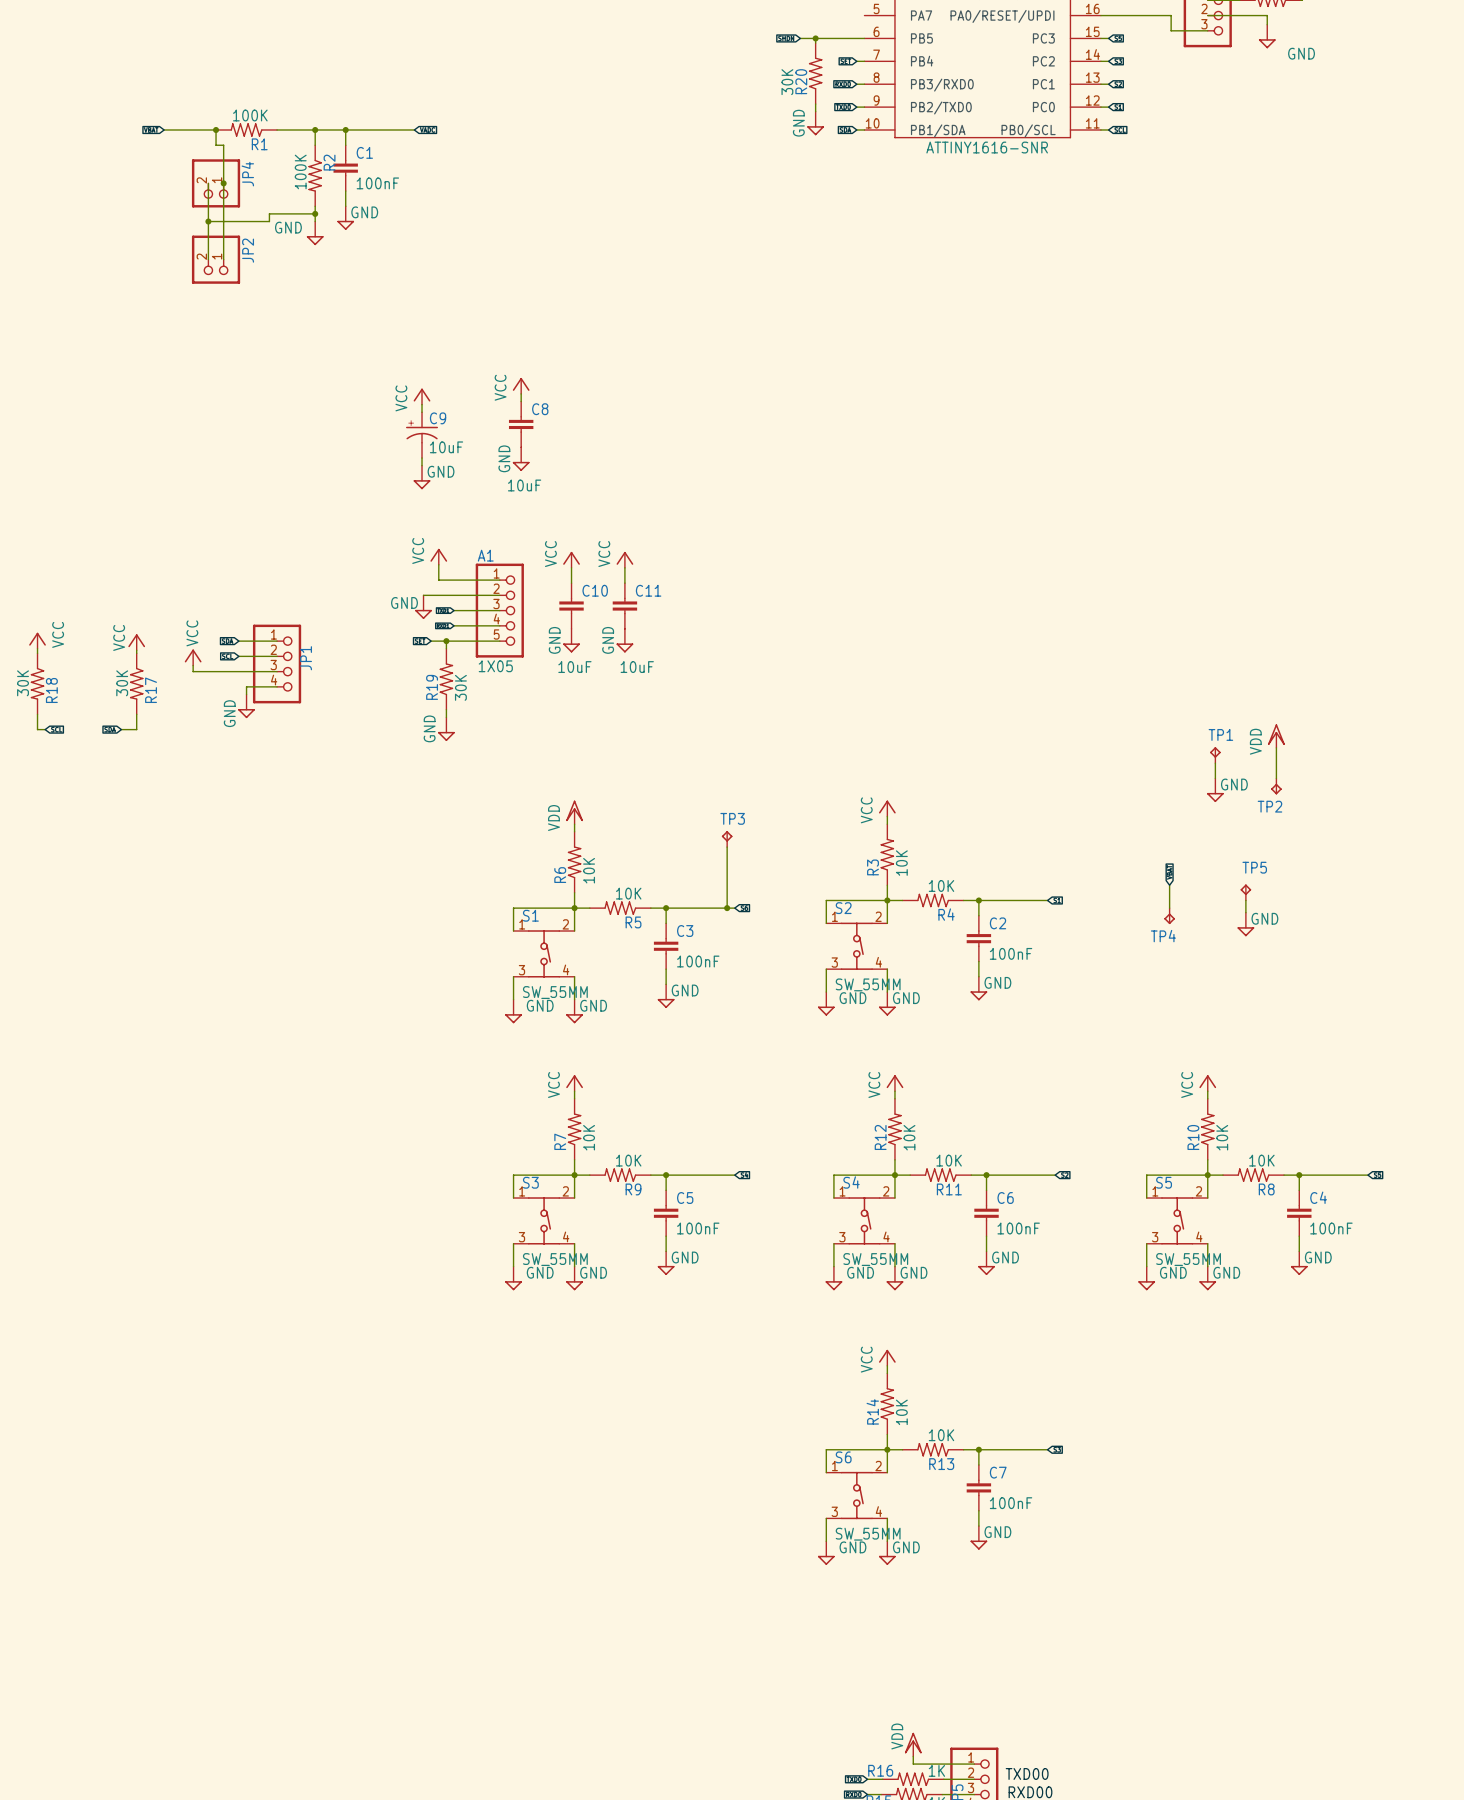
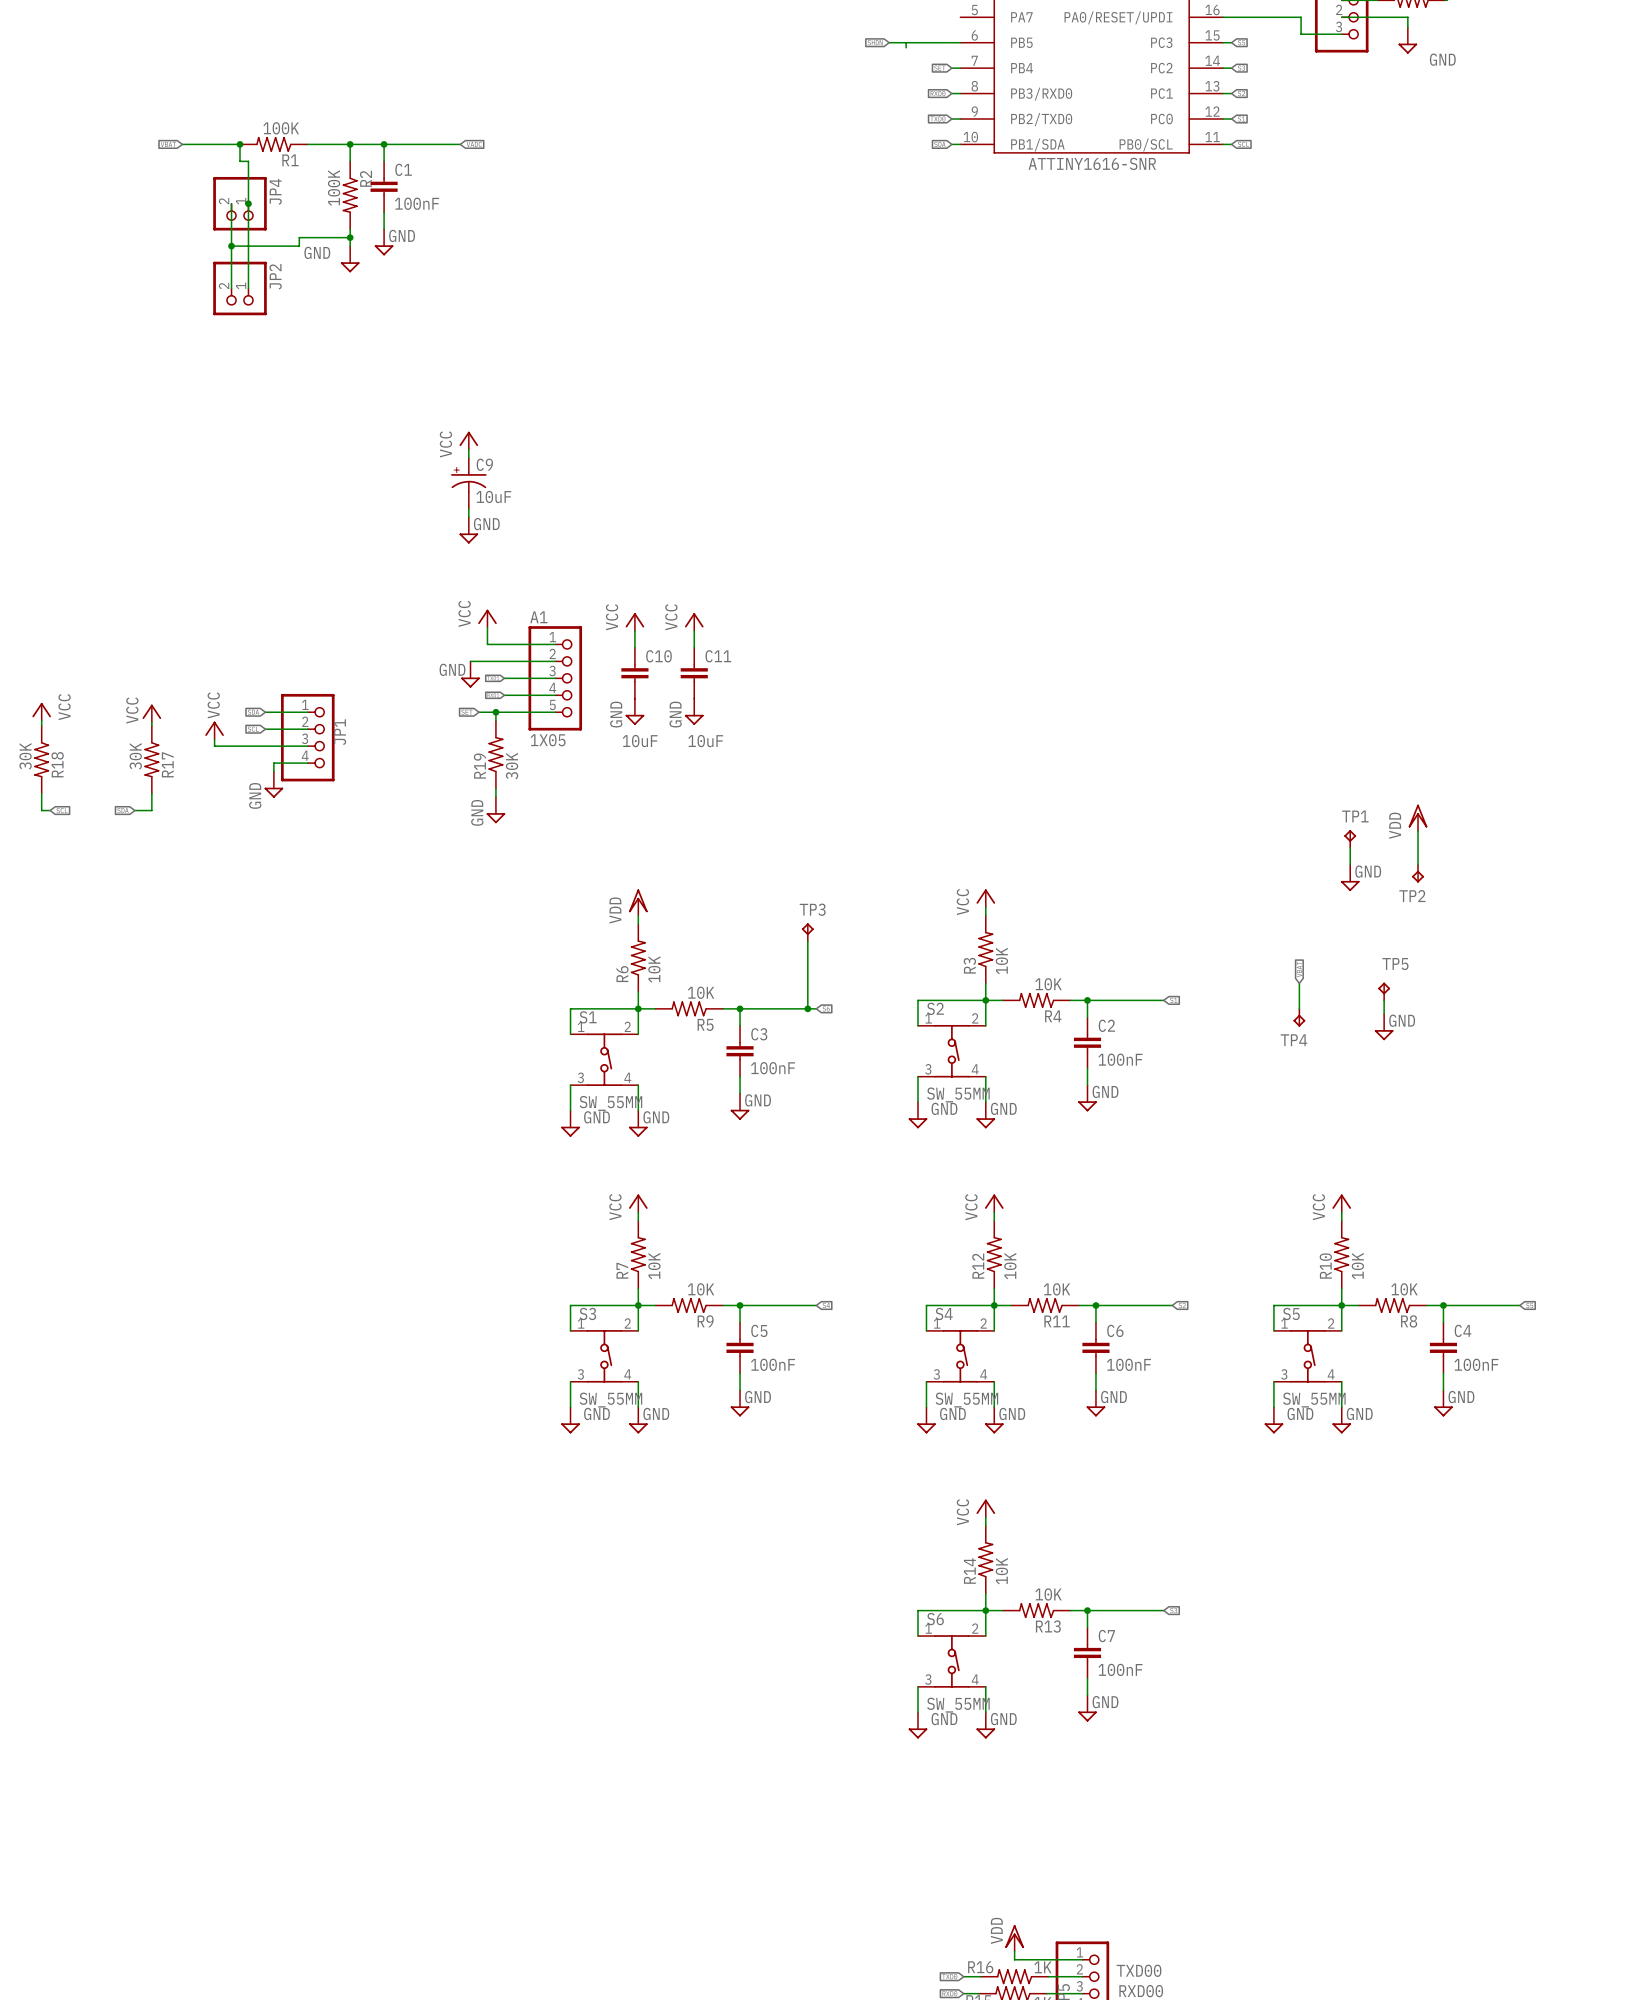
junction: (815, 38) -> none
R20: 30K (815, 73) -> none
wire: (815, 104) (815, 111) -> none
power symbol: GND (815, 123) -> none
power symbol: VCC (521, 385) -> none
wire: (521, 393) (521, 401) -> none
C8: 10uF (521, 424) -> none
power symbol: GND (521, 459) -> none

